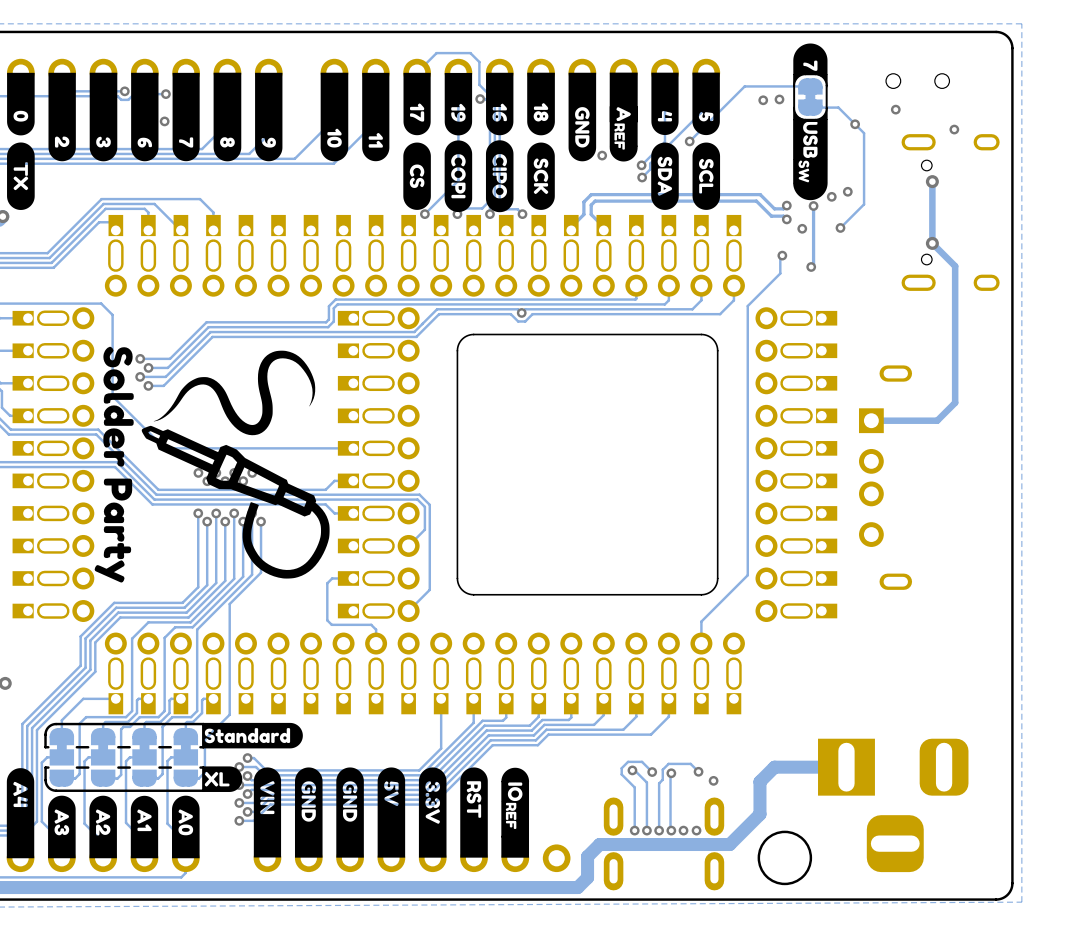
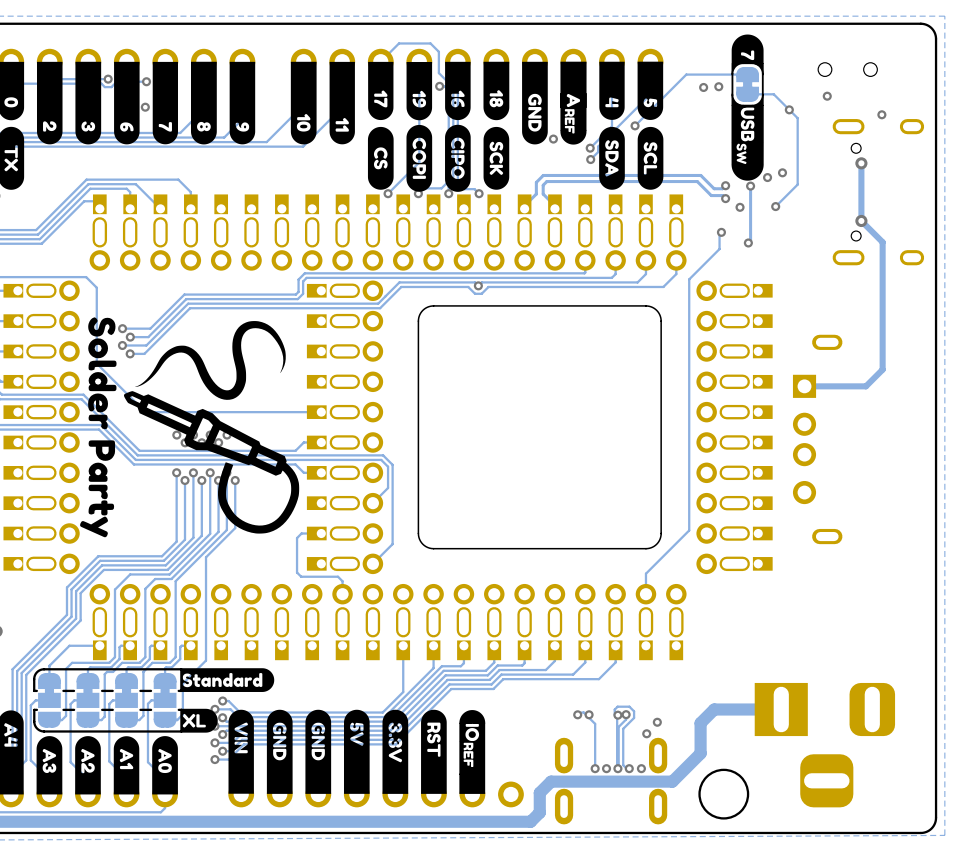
via: (632, 770) -> none
track: (698, 771) (690, 763) (668, 763) (662, 769) (662, 779) (659, 783) (659, 830) -> none
via: (698, 771) -> none
via: none -> (577, 714)
via: none -> (589, 714)
track: (652, 772) (642, 761) (628, 761) (621, 768) (621, 774) (634, 787) (634, 830) -> none
via: (652, 772) -> none
track: none -> (614, 714) (614, 709) (617, 706) (629, 706) (634, 711) (634, 717) (623, 728) (623, 765) (626, 768)
track: none -> (626, 714) (626, 719) (618, 726) (618, 765) (615, 768)
via: none -> (626, 714)
via: none -> (646, 733)
via: (634, 830) -> none

